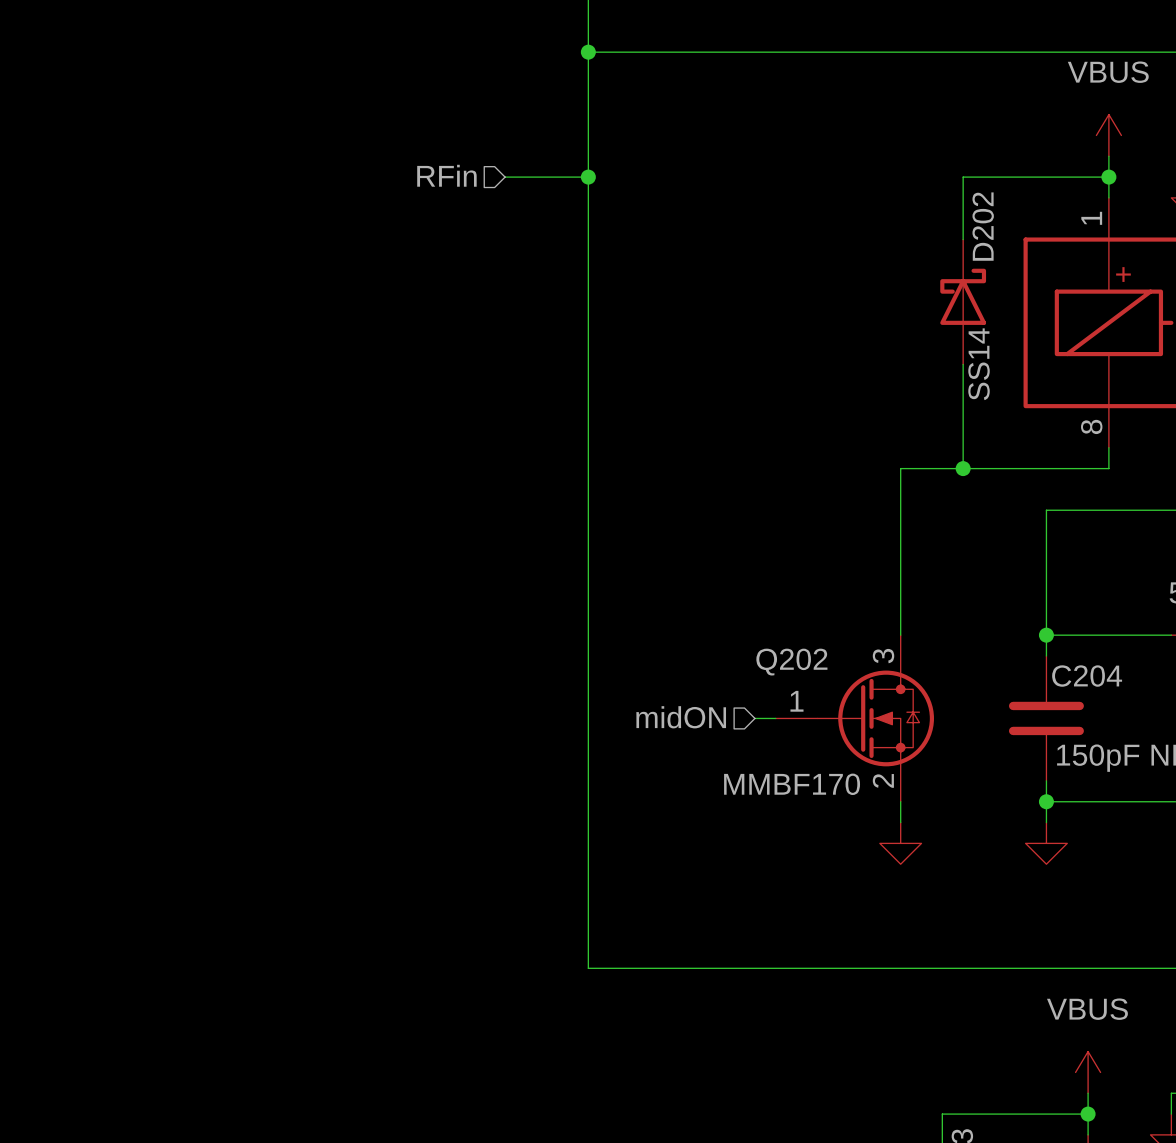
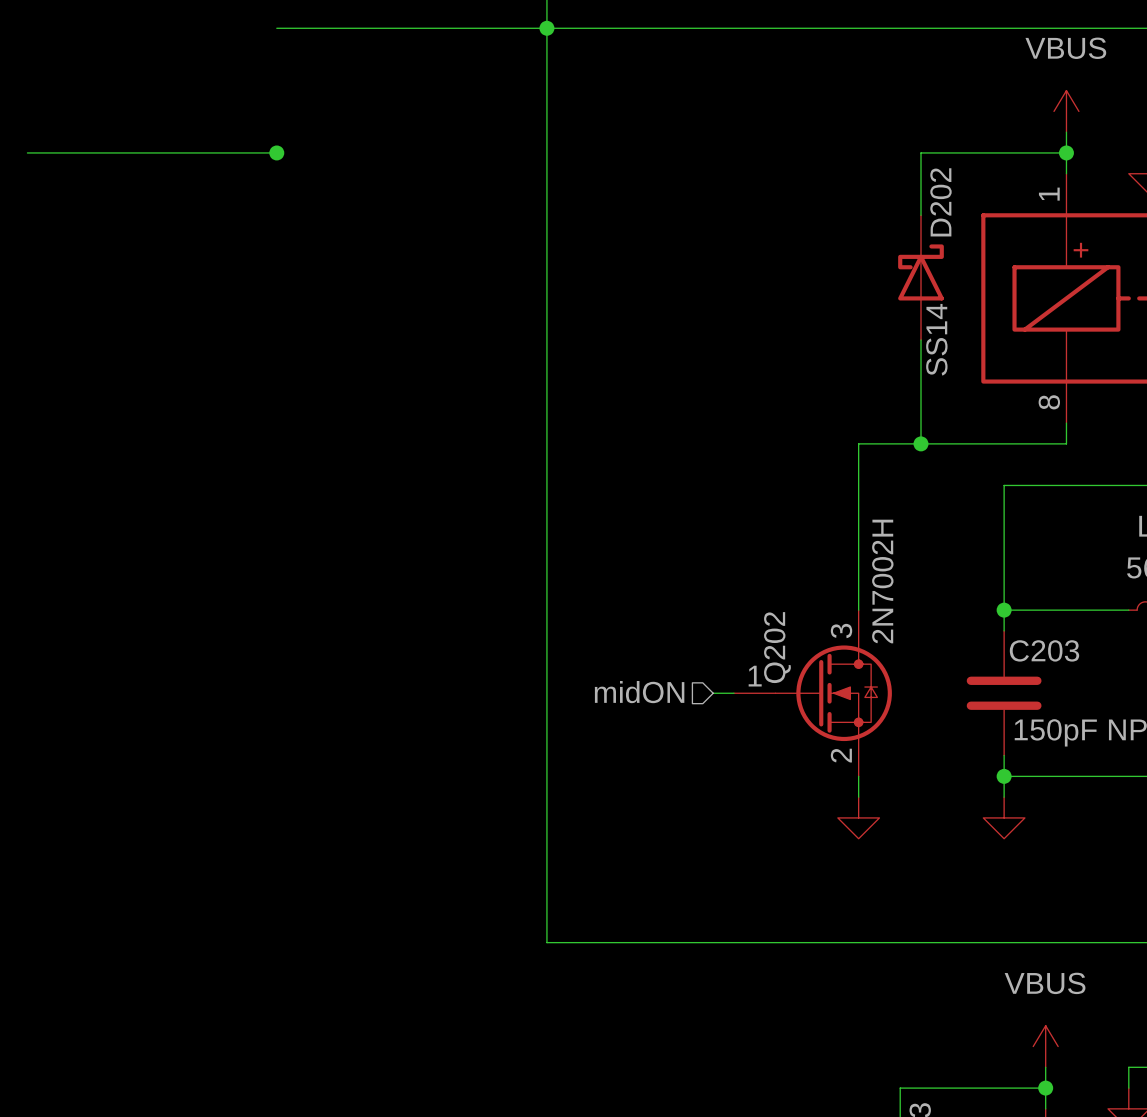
wire: none -> (276, 28) (546, 28)
hierarchical label: RFin (446, 175) -> none
wire: none -> (27, 152) (276, 152)
junction: none -> (276, 152)
wire: (505, 177) (588, 177) -> none
junction: (588, 177) -> none
Q202 name rotation: 0° (791, 662) -> 90° counterclockwise (777, 647)
C204 name: C204 (1087, 676) -> C203 (1044, 650)
Q202 value: MMBF170 (792, 784) -> 2N7002H (882, 581)

